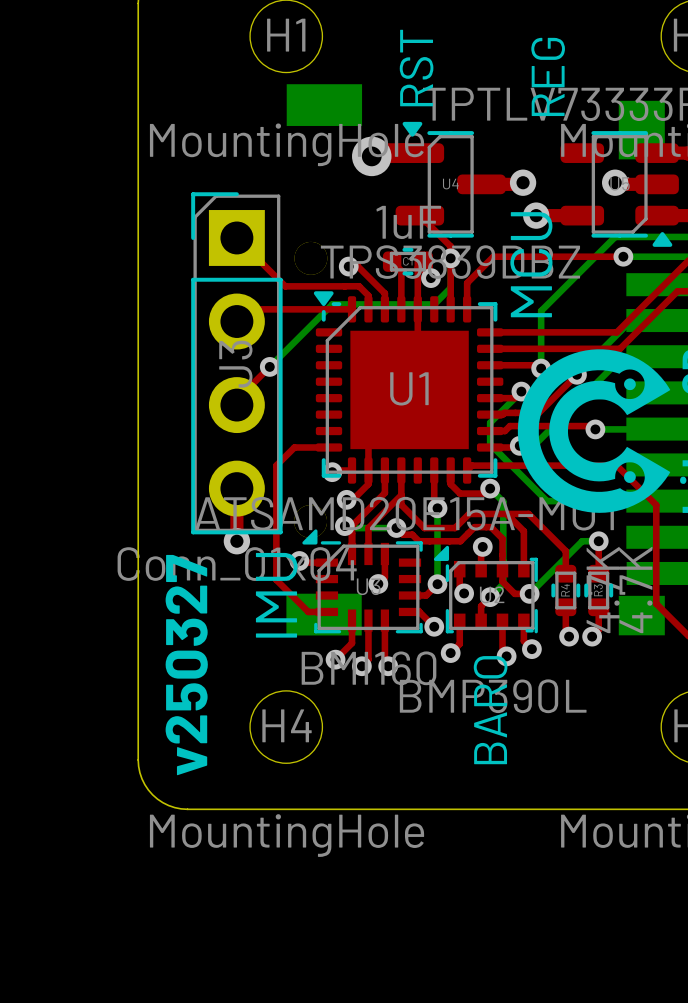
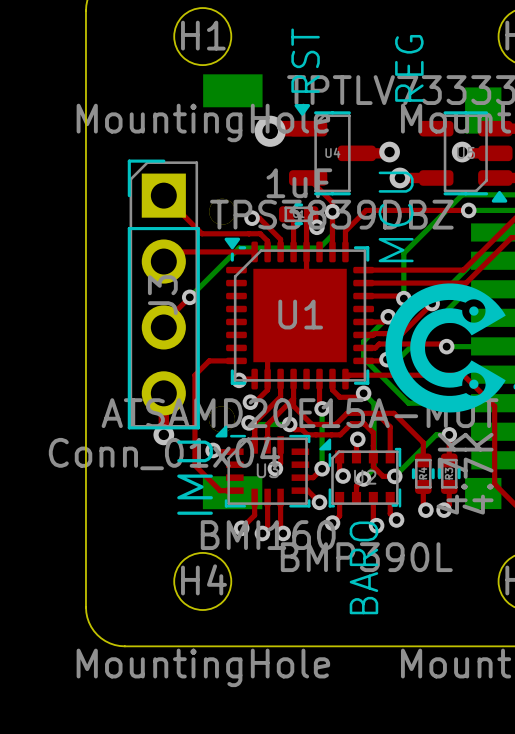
text: v250327 (186, 665) -> none

